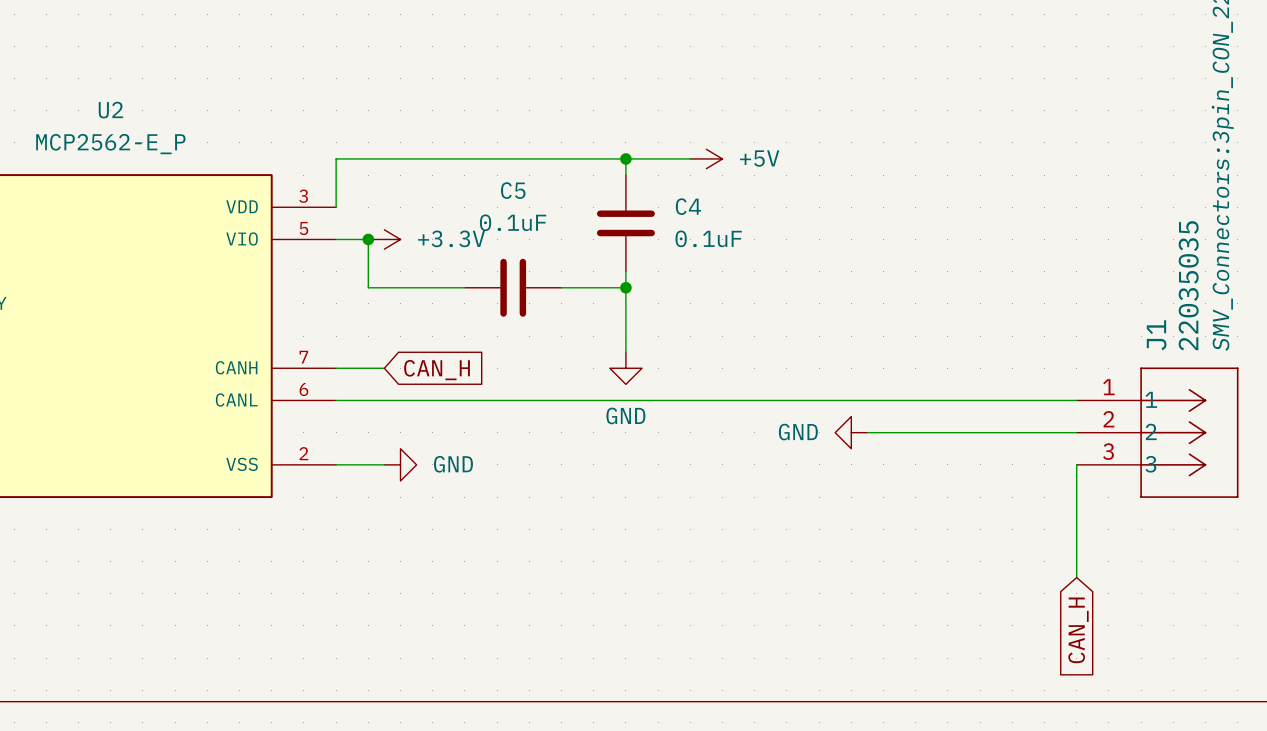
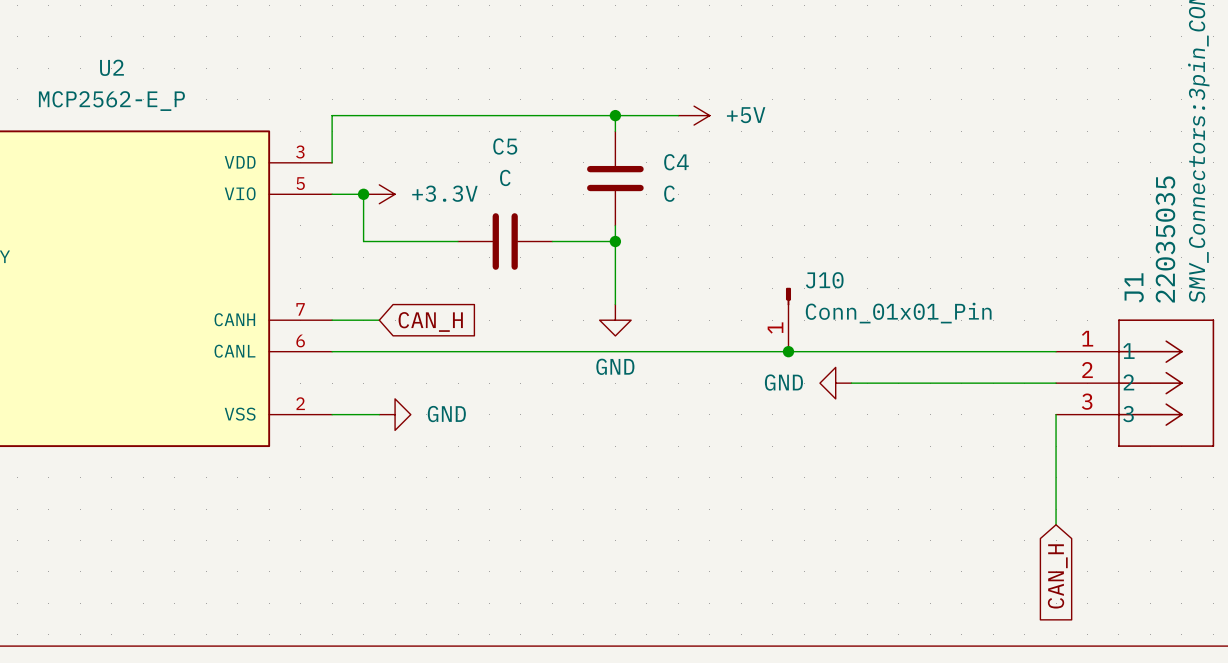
C5 value: 0.1uF (513, 222) -> C (505, 177)
C4 value: 0.1uF (708, 238) -> C (669, 193)
J10: none -> Conn_01x01_Pin (788, 319)
junction: none -> (788, 351)

